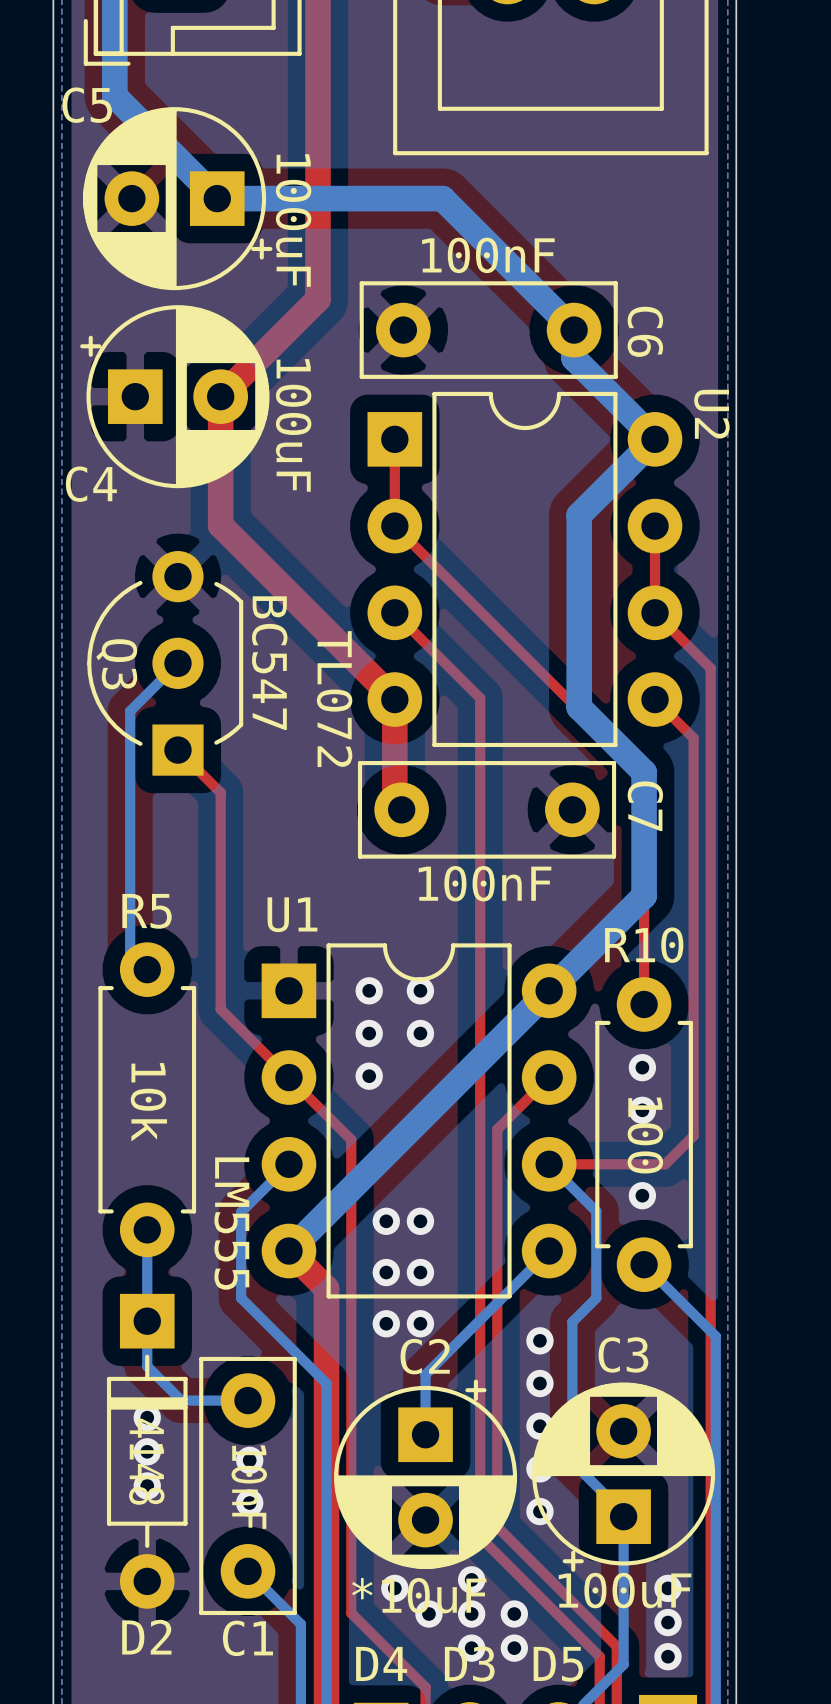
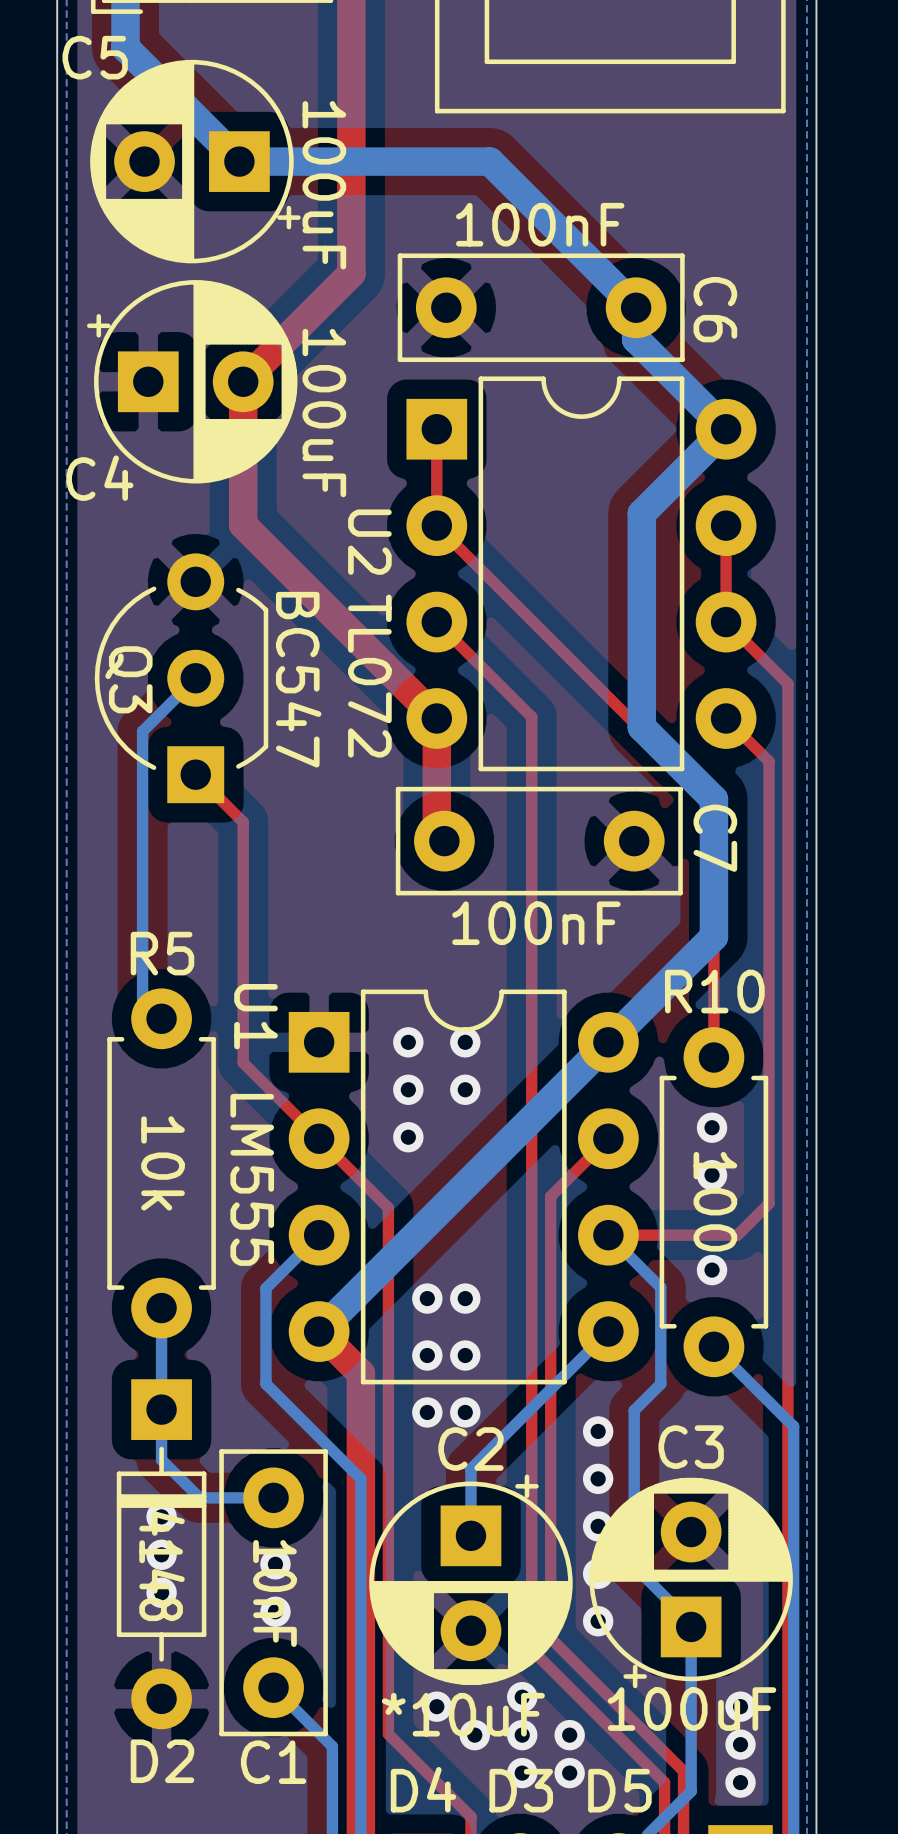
U2 name position: U2 (711, 414) -> U2 (369, 542)
U2 value position: TL072 (334, 699) -> TL072 (369, 676)
U1 name rotation: 0° (292, 914) -> 90° clockwise (256, 1016)
U1 value position: LM555 (231, 1223) -> LM555 (252, 1179)

